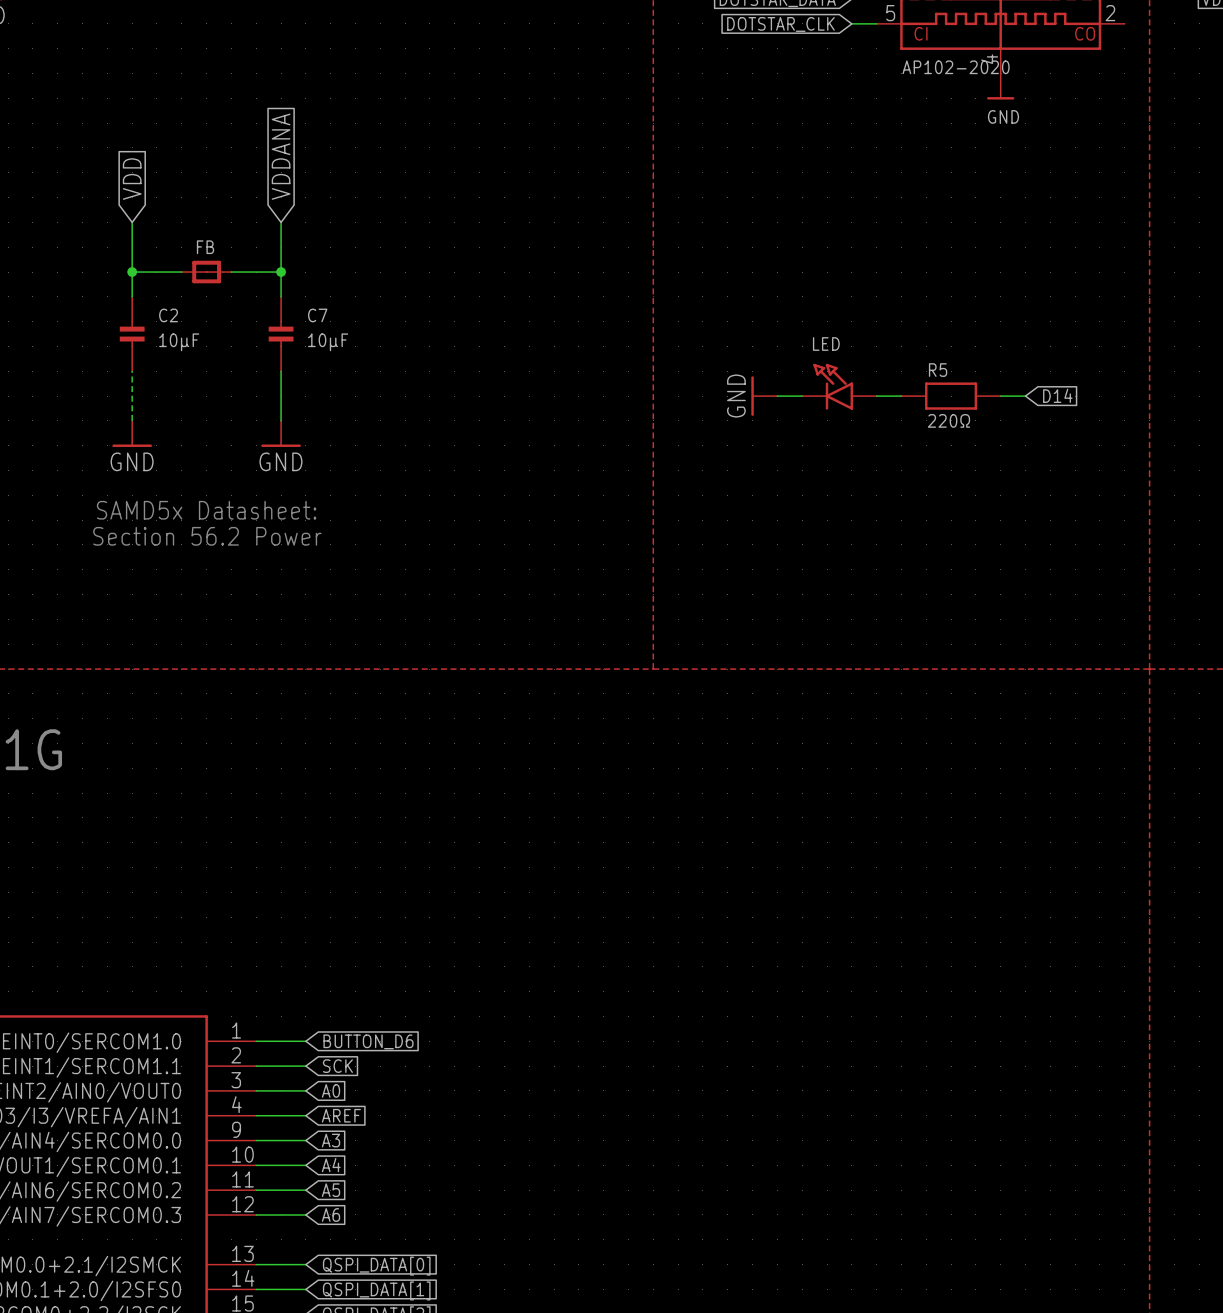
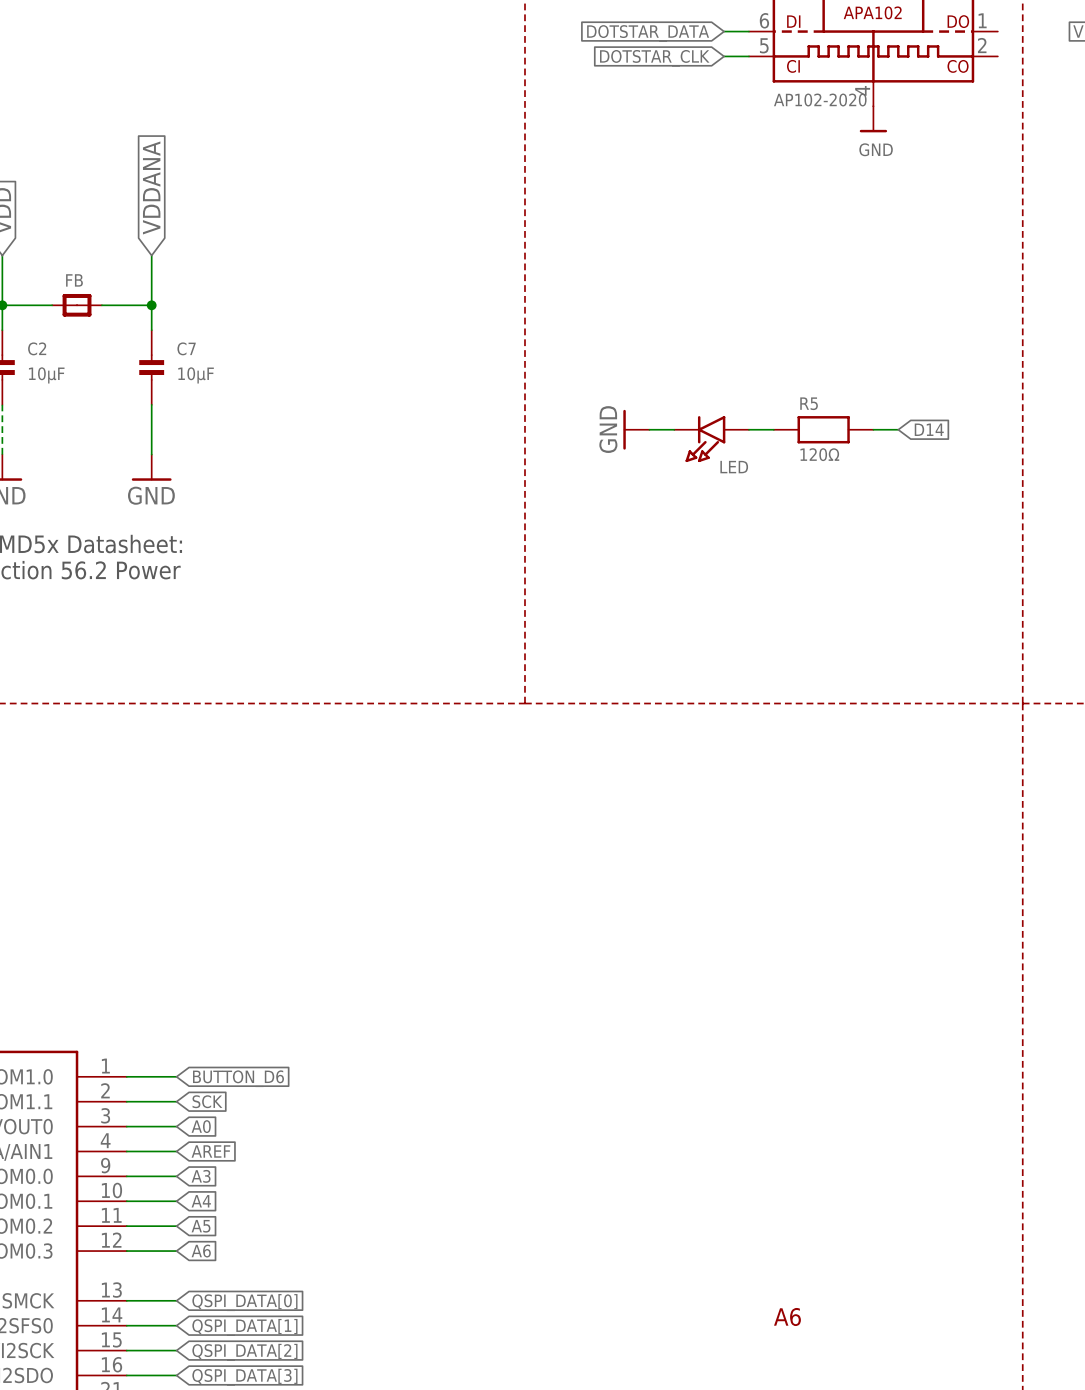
LED: (839, 386) -> none
LED: none -> (711, 439)
R5 value: 220Ω (948, 420) -> 120Ω (819, 454)
part: none -> (787, 1317)

